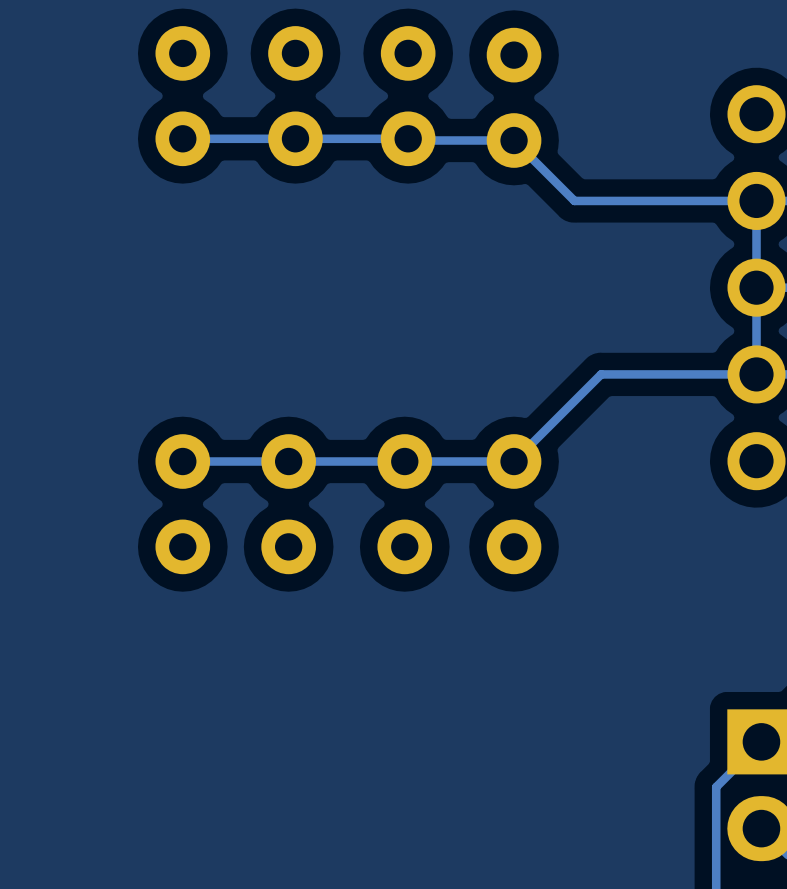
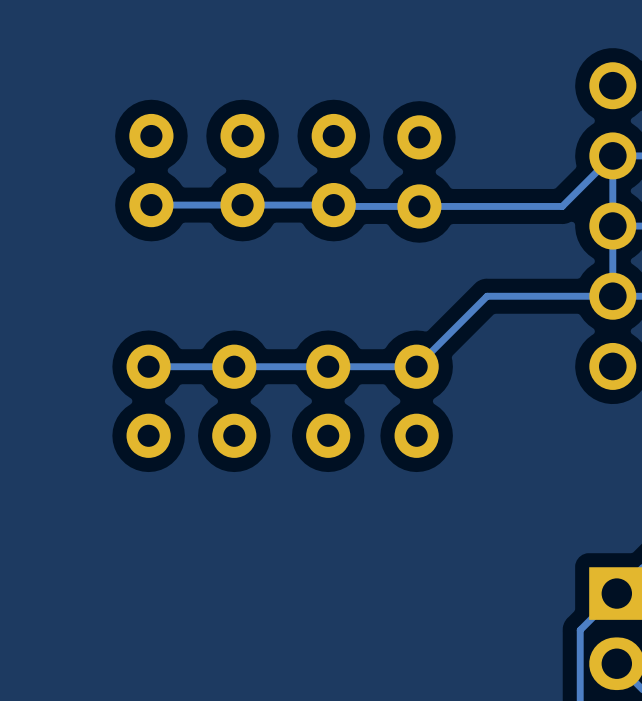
part: (182, 96) -> none
part: (295, 96) -> none
part: (408, 96) -> none
part: (514, 97) -> none
track: (182, 138) (514, 140) (574, 200) (756, 200) -> (151, 205) (562, 206) (612, 155)
part: none -> (151, 170)
part: none -> (242, 170)
part: none -> (333, 170)
part: none -> (419, 171)

